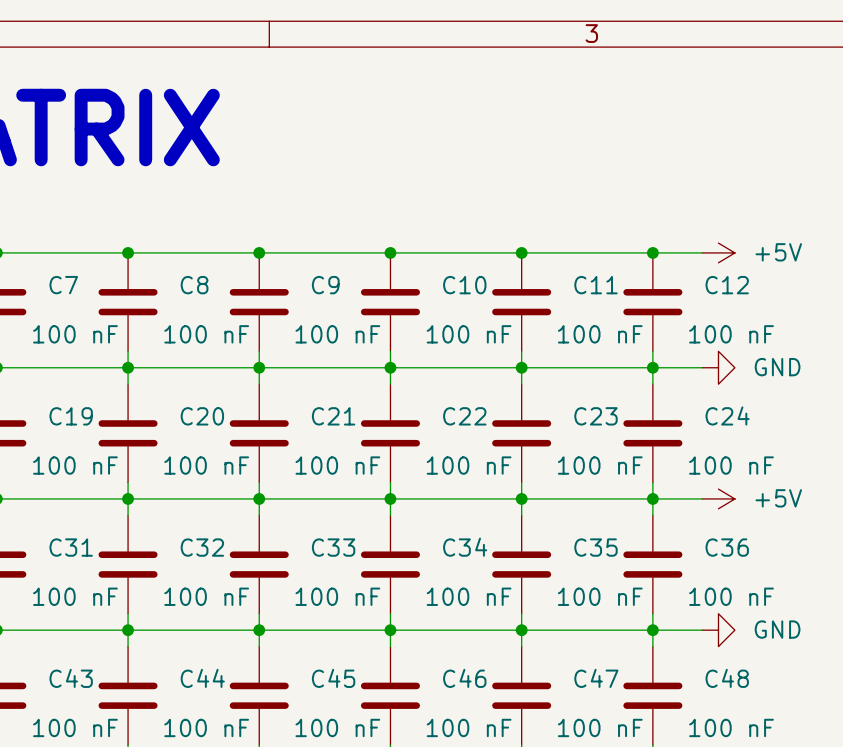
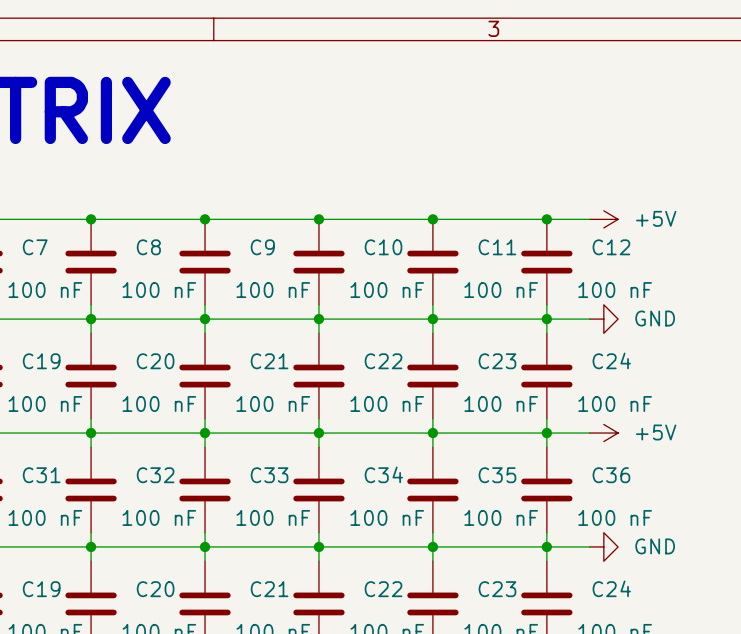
C43 name: C43 (71, 678) -> C19 (41, 589)
C44 name: C44 (202, 678) -> C20 (155, 589)
C45 name: C45 (333, 678) -> C21 (269, 589)
C46 name: C46 (464, 678) -> C22 (383, 589)
C47 name: C47 (596, 678) -> C23 (497, 589)
C48 name: C48 (727, 678) -> C24 (611, 588)

